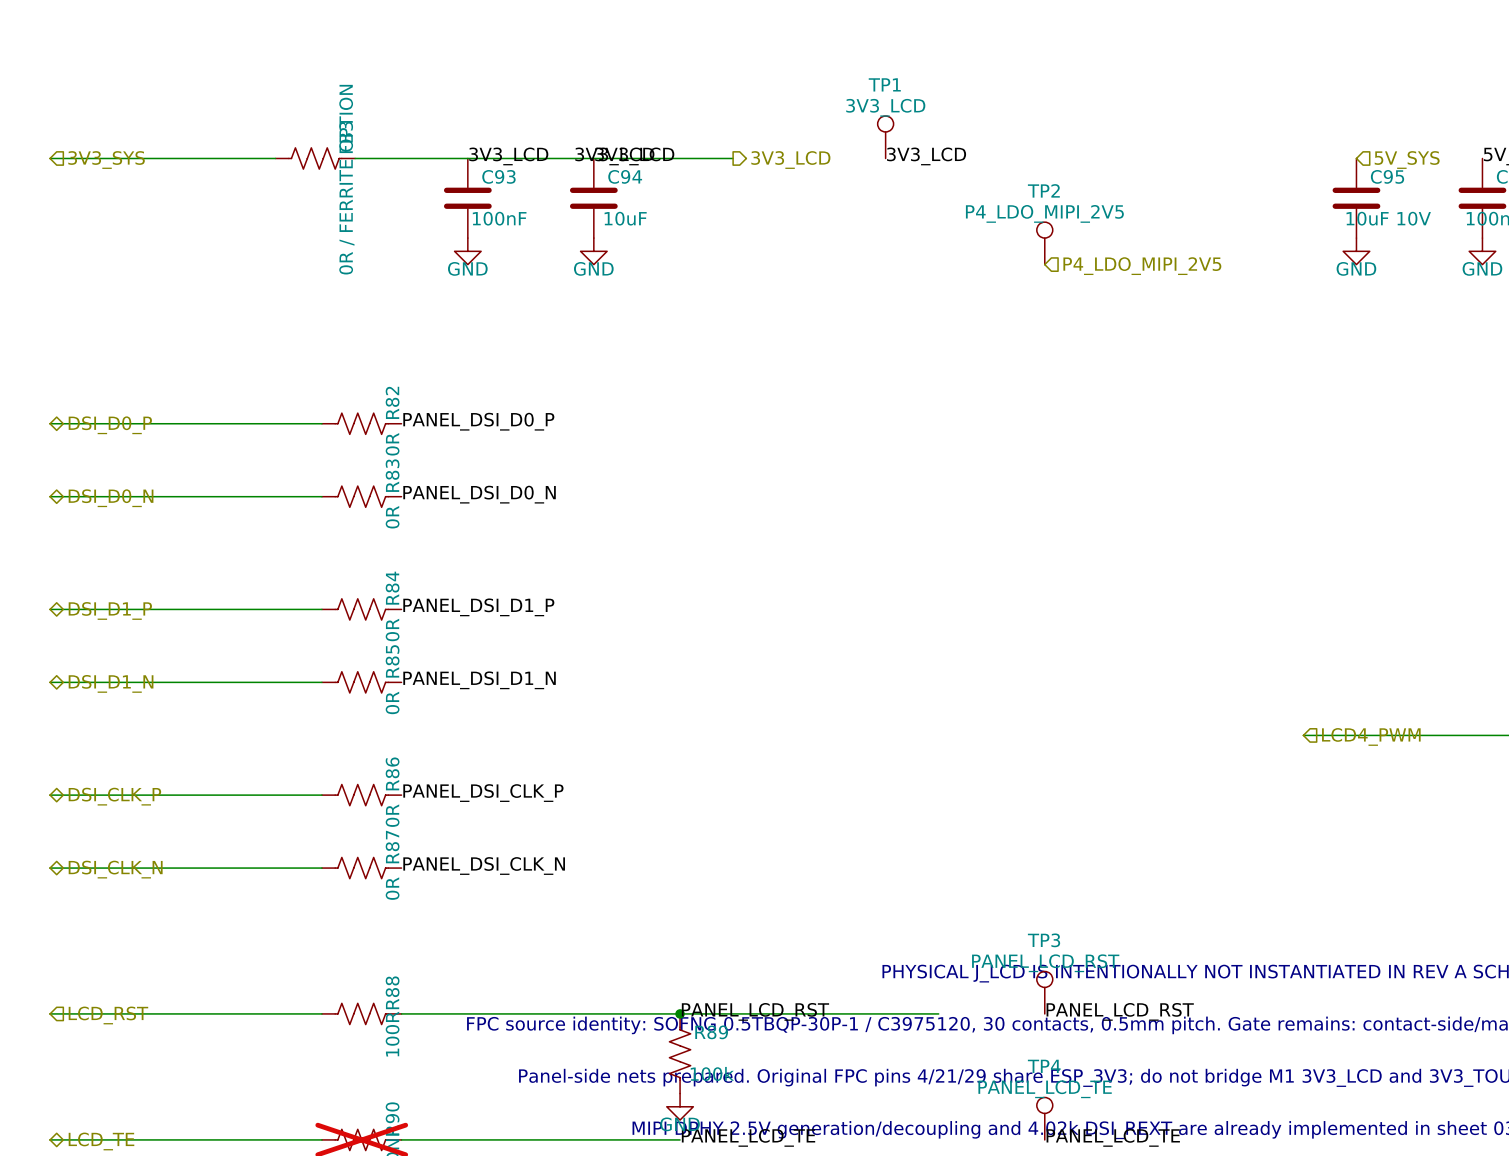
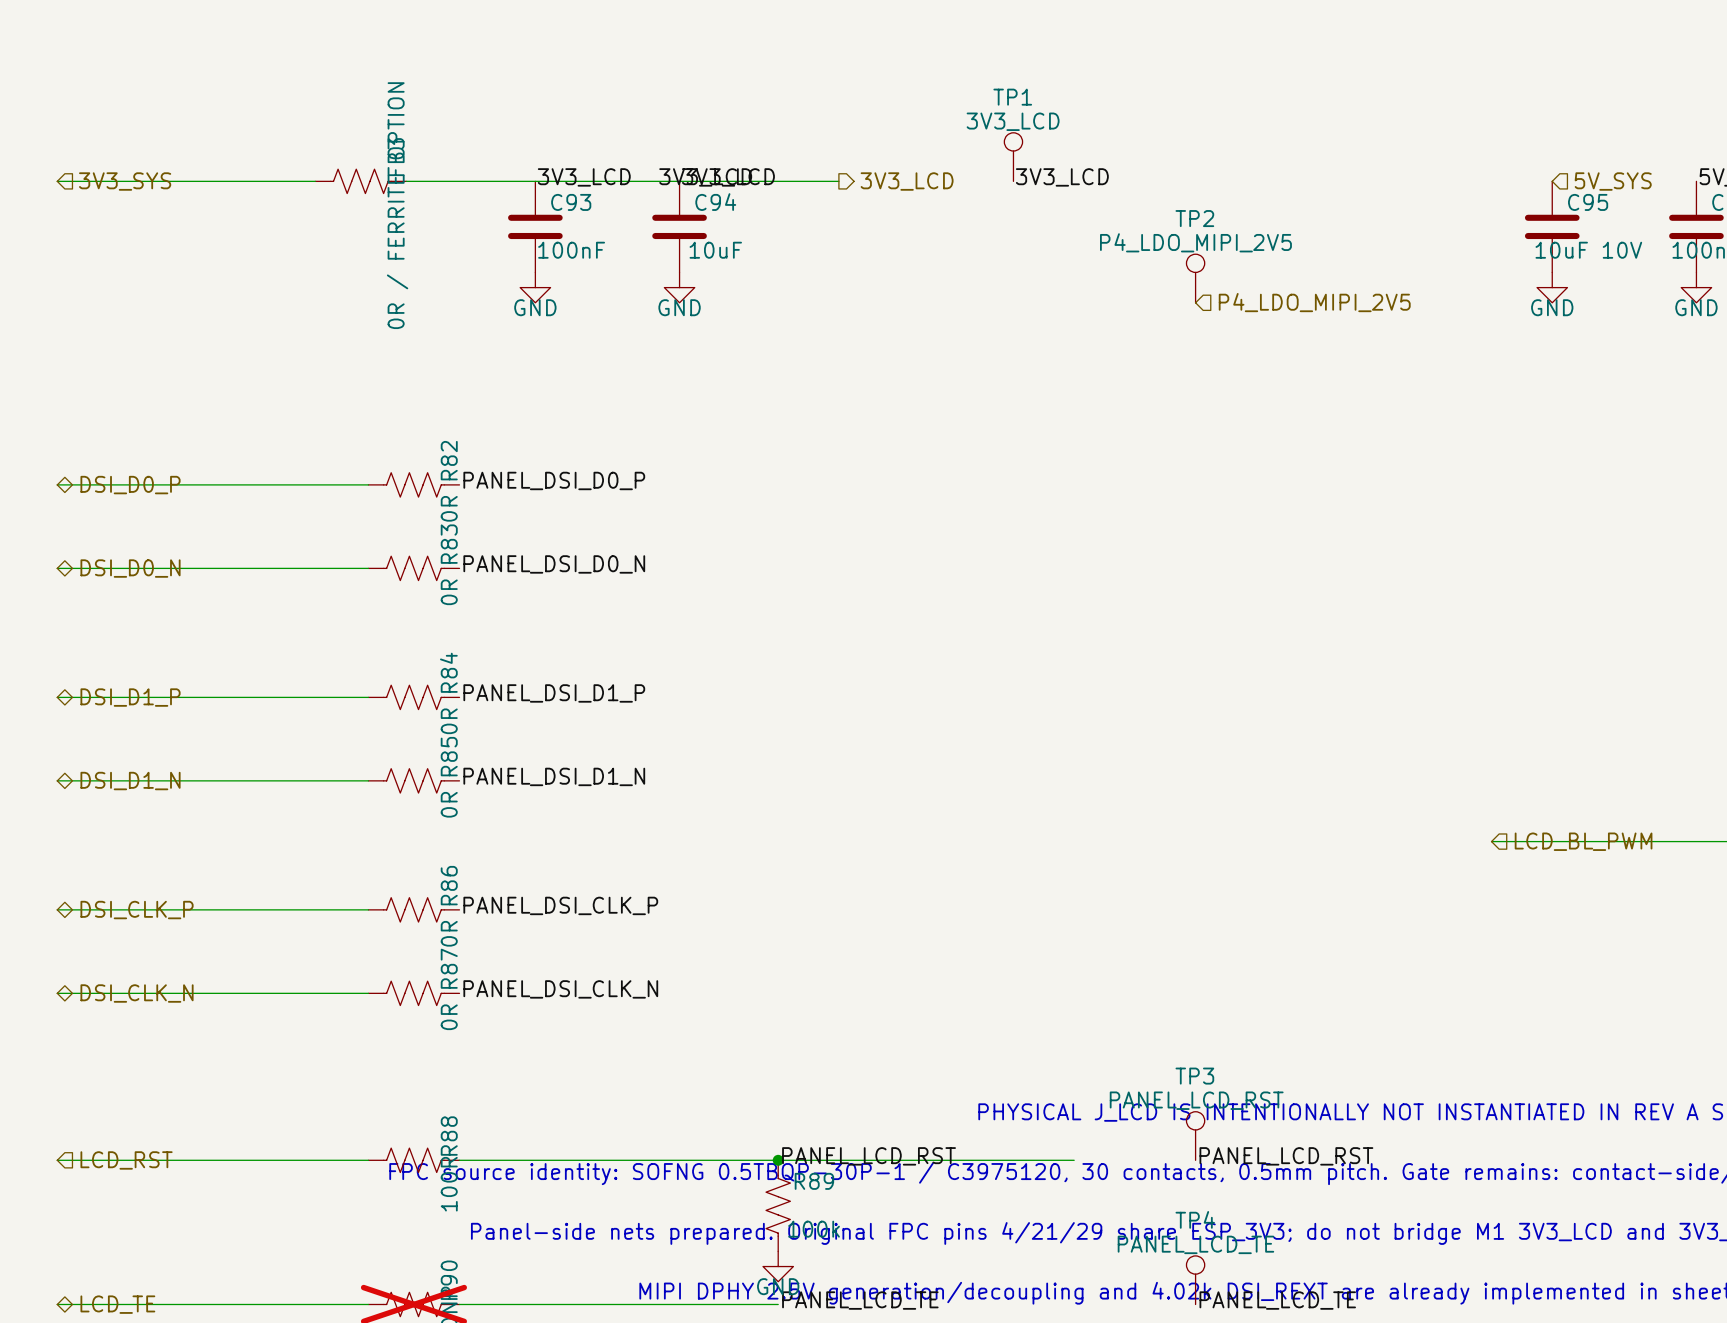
hierarchical label: LCD4_PWM (1371, 736) -> LCD_BL_PWM (1583, 841)

